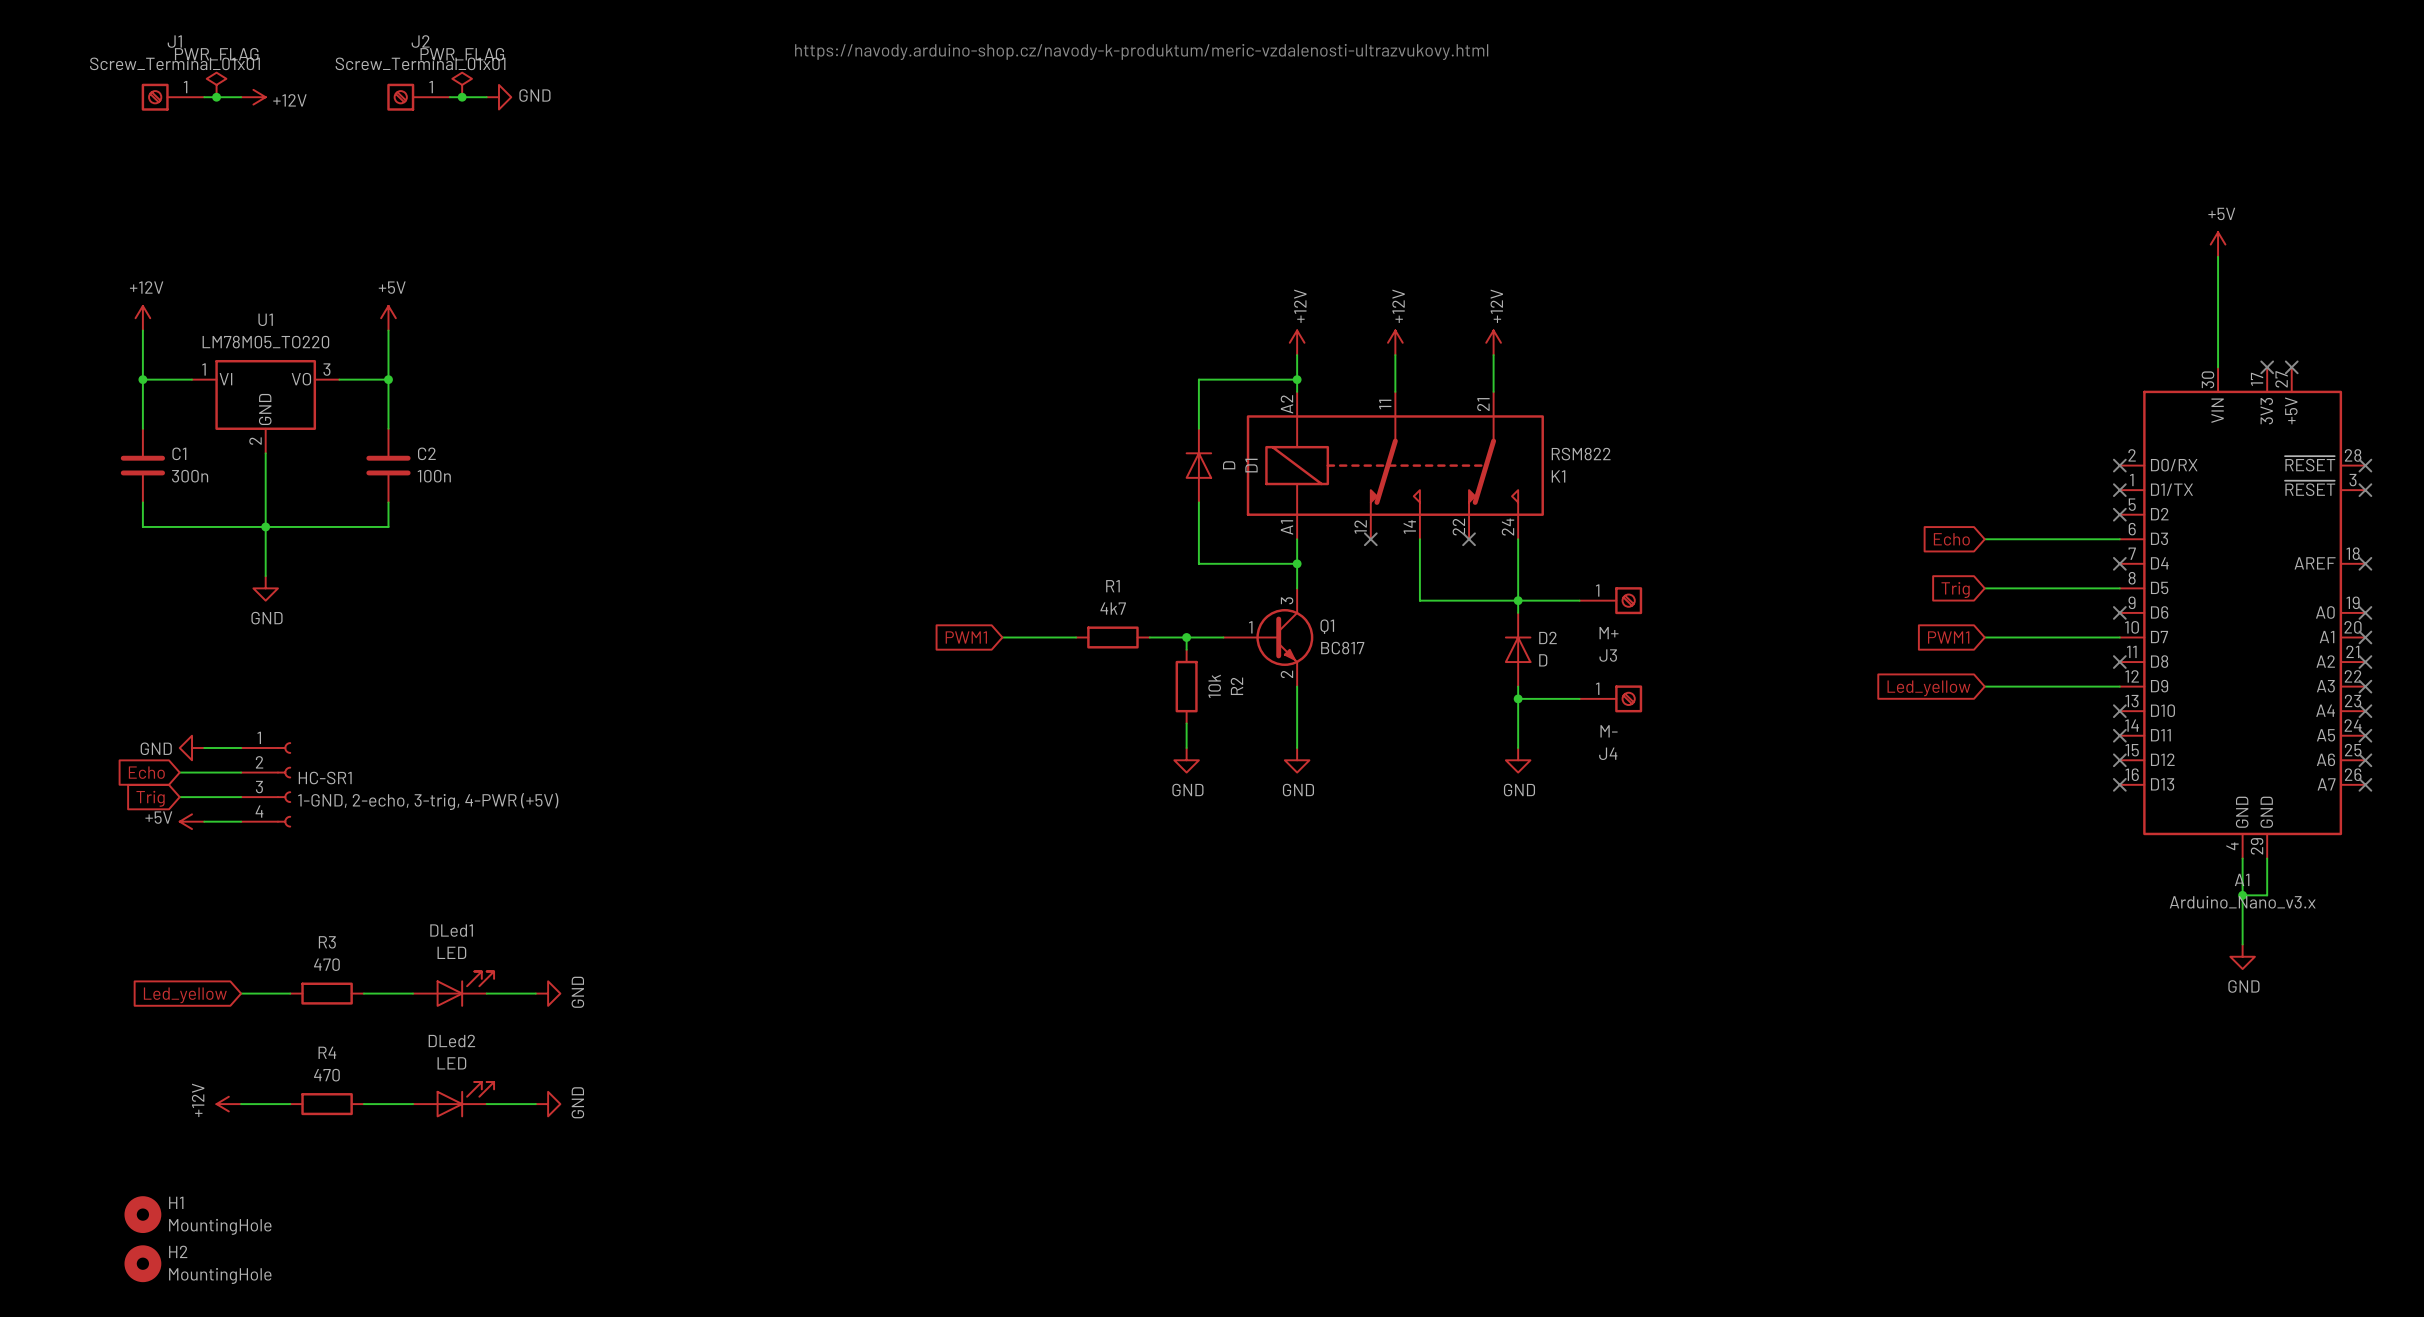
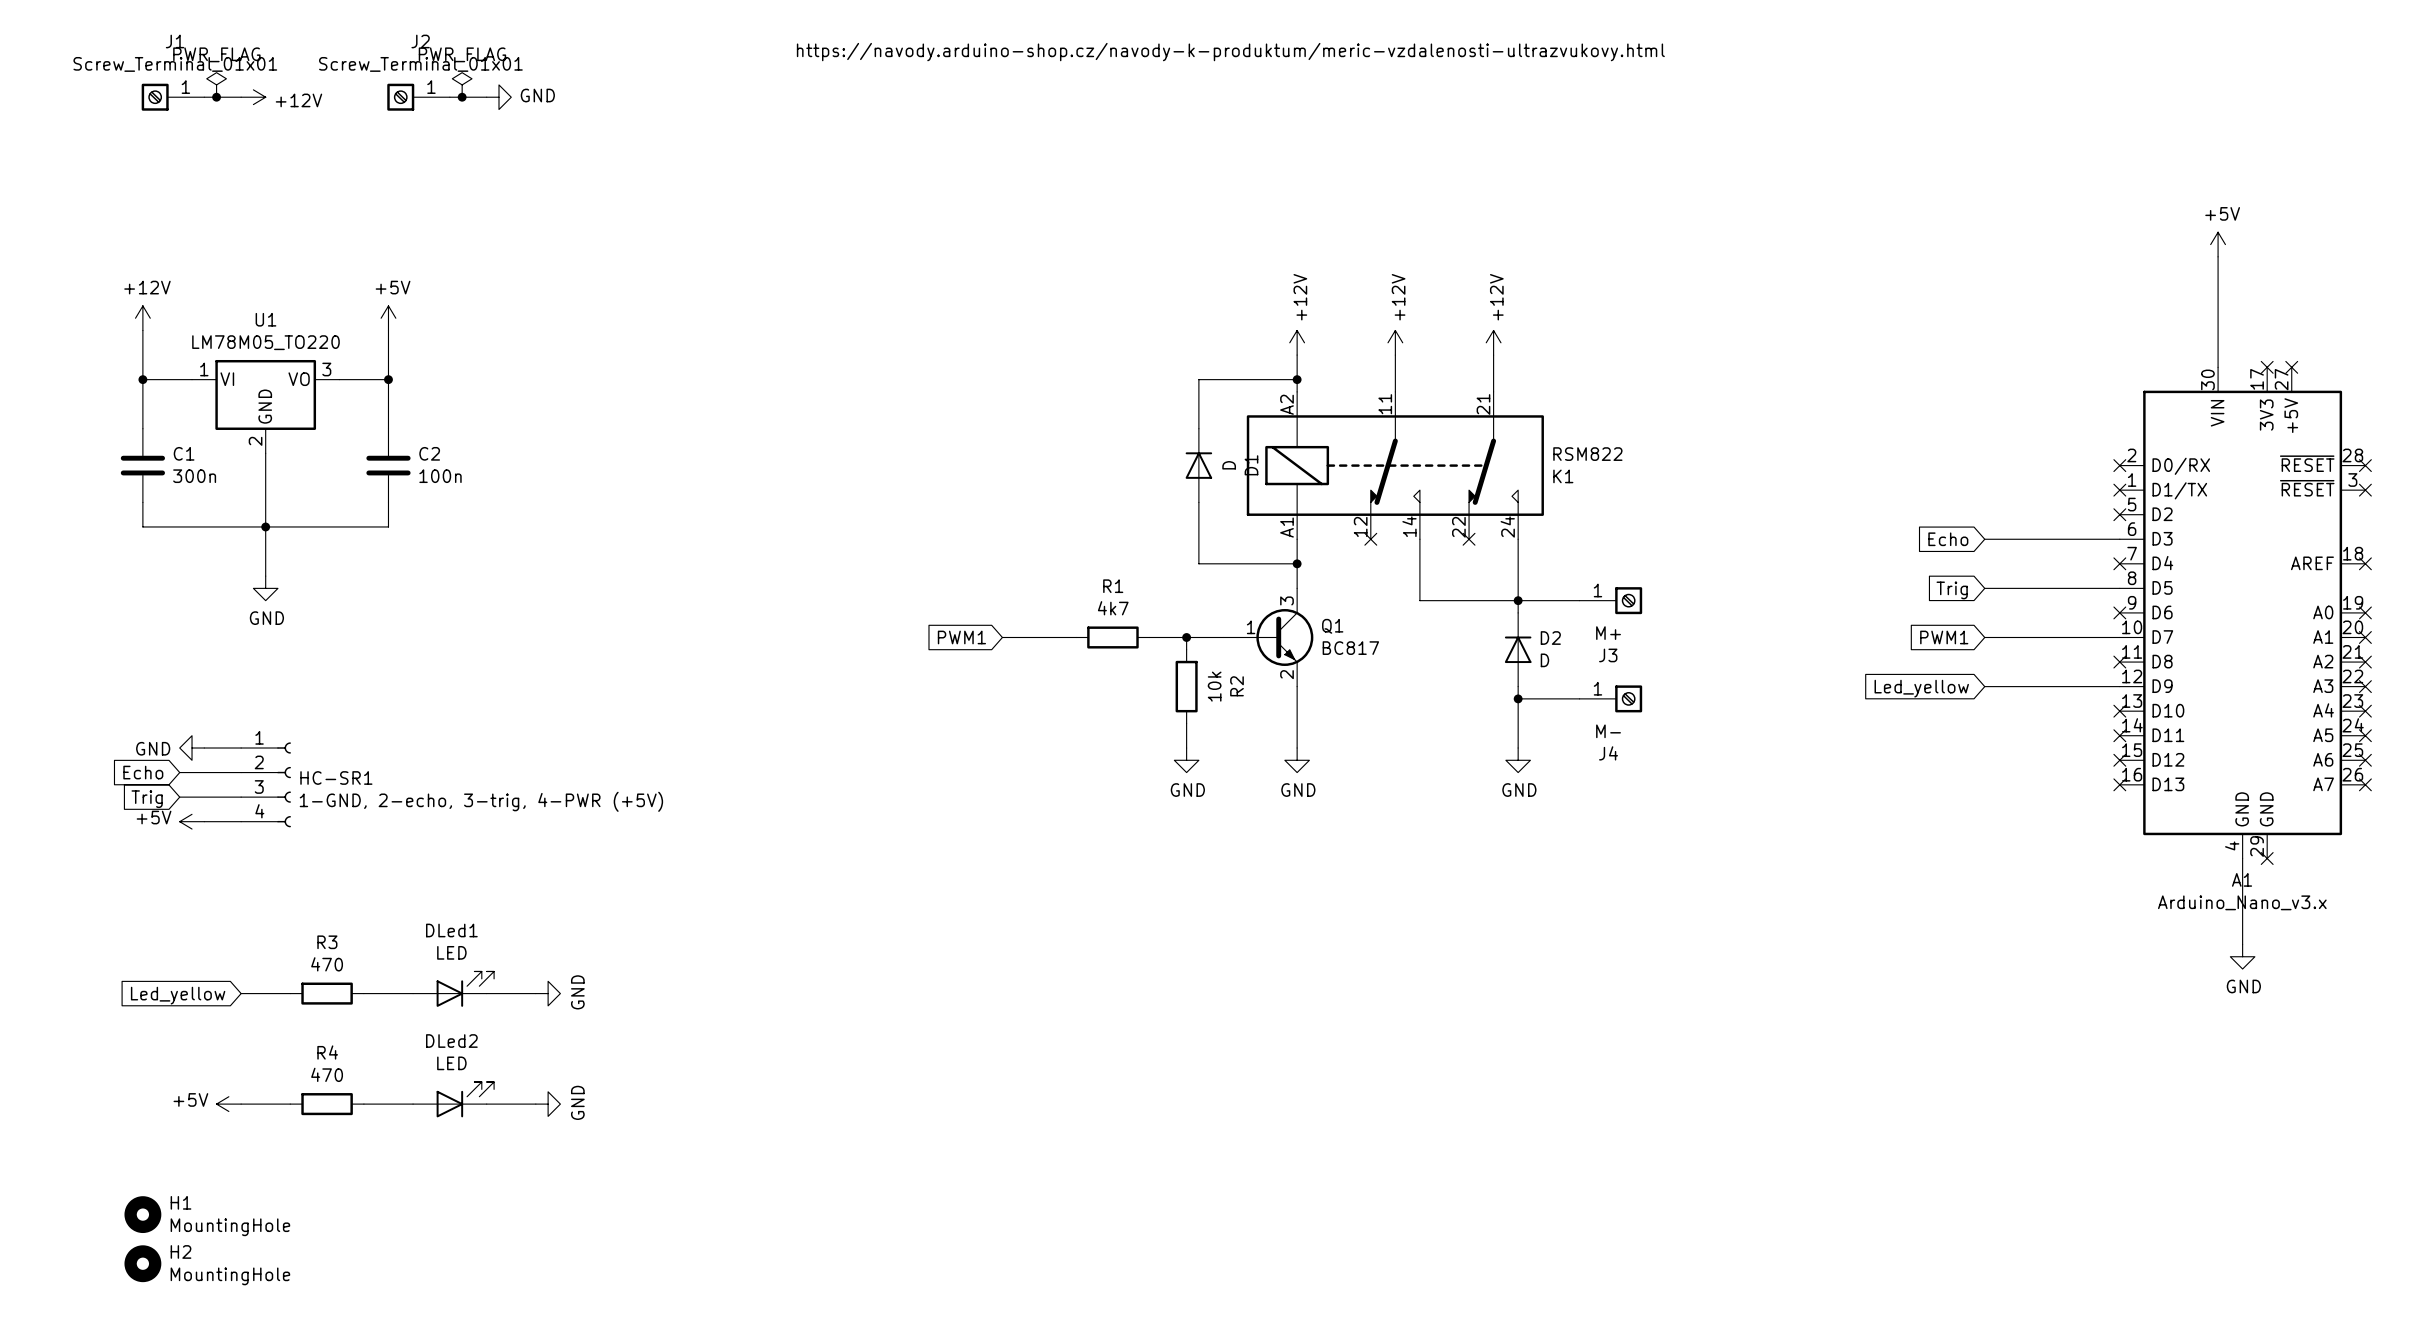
wire: (2267, 858) (2267, 895) (2242, 895) -> none
no-connect mark: none -> (2267, 858)
junction: (2242, 895) -> none
power symbol: +12V (228, 1104) -> +5V (228, 1104)

